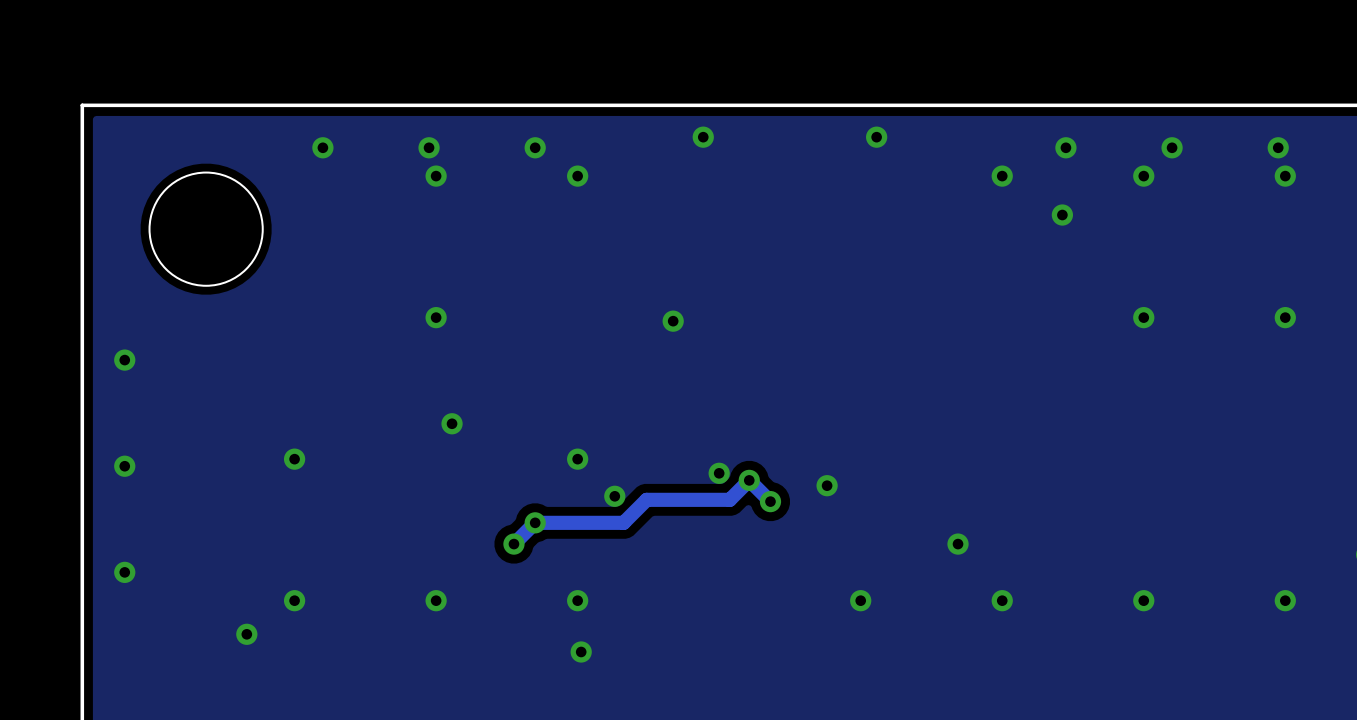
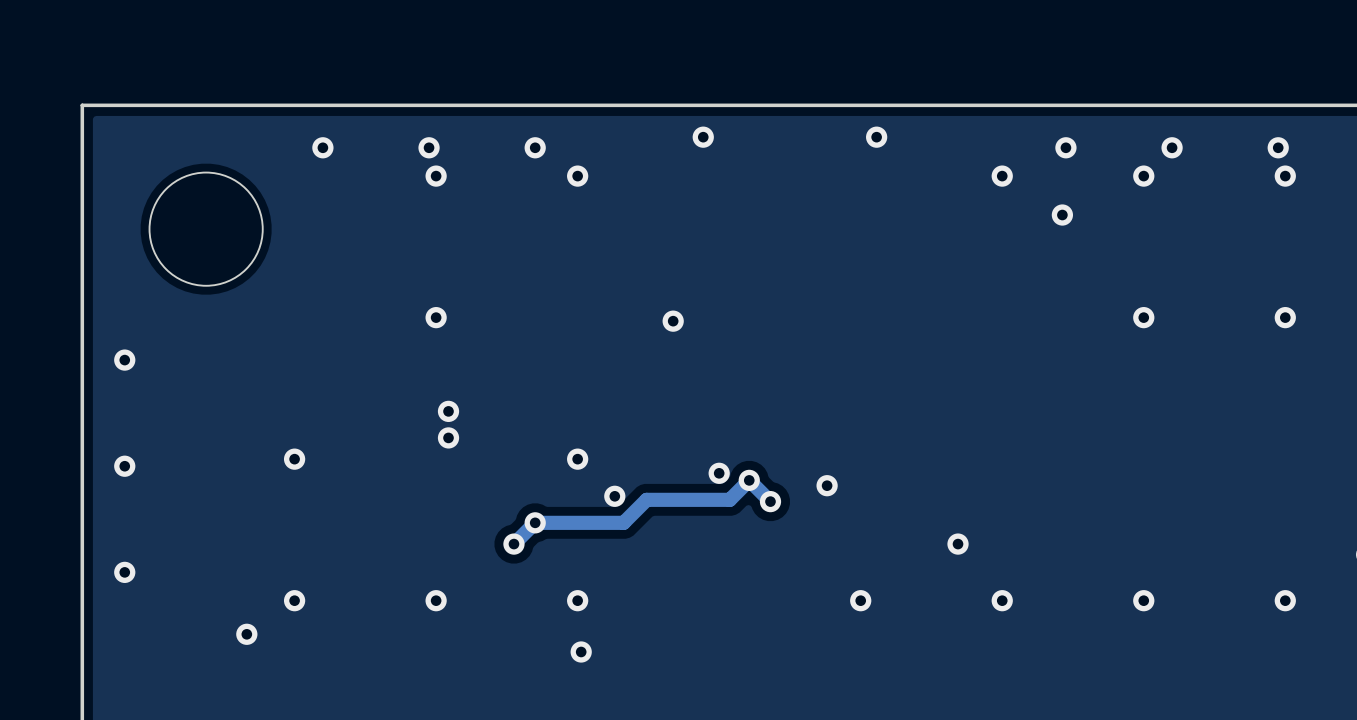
via: none -> (448, 411)
via: (452, 423) -> none
via: none -> (448, 437)

